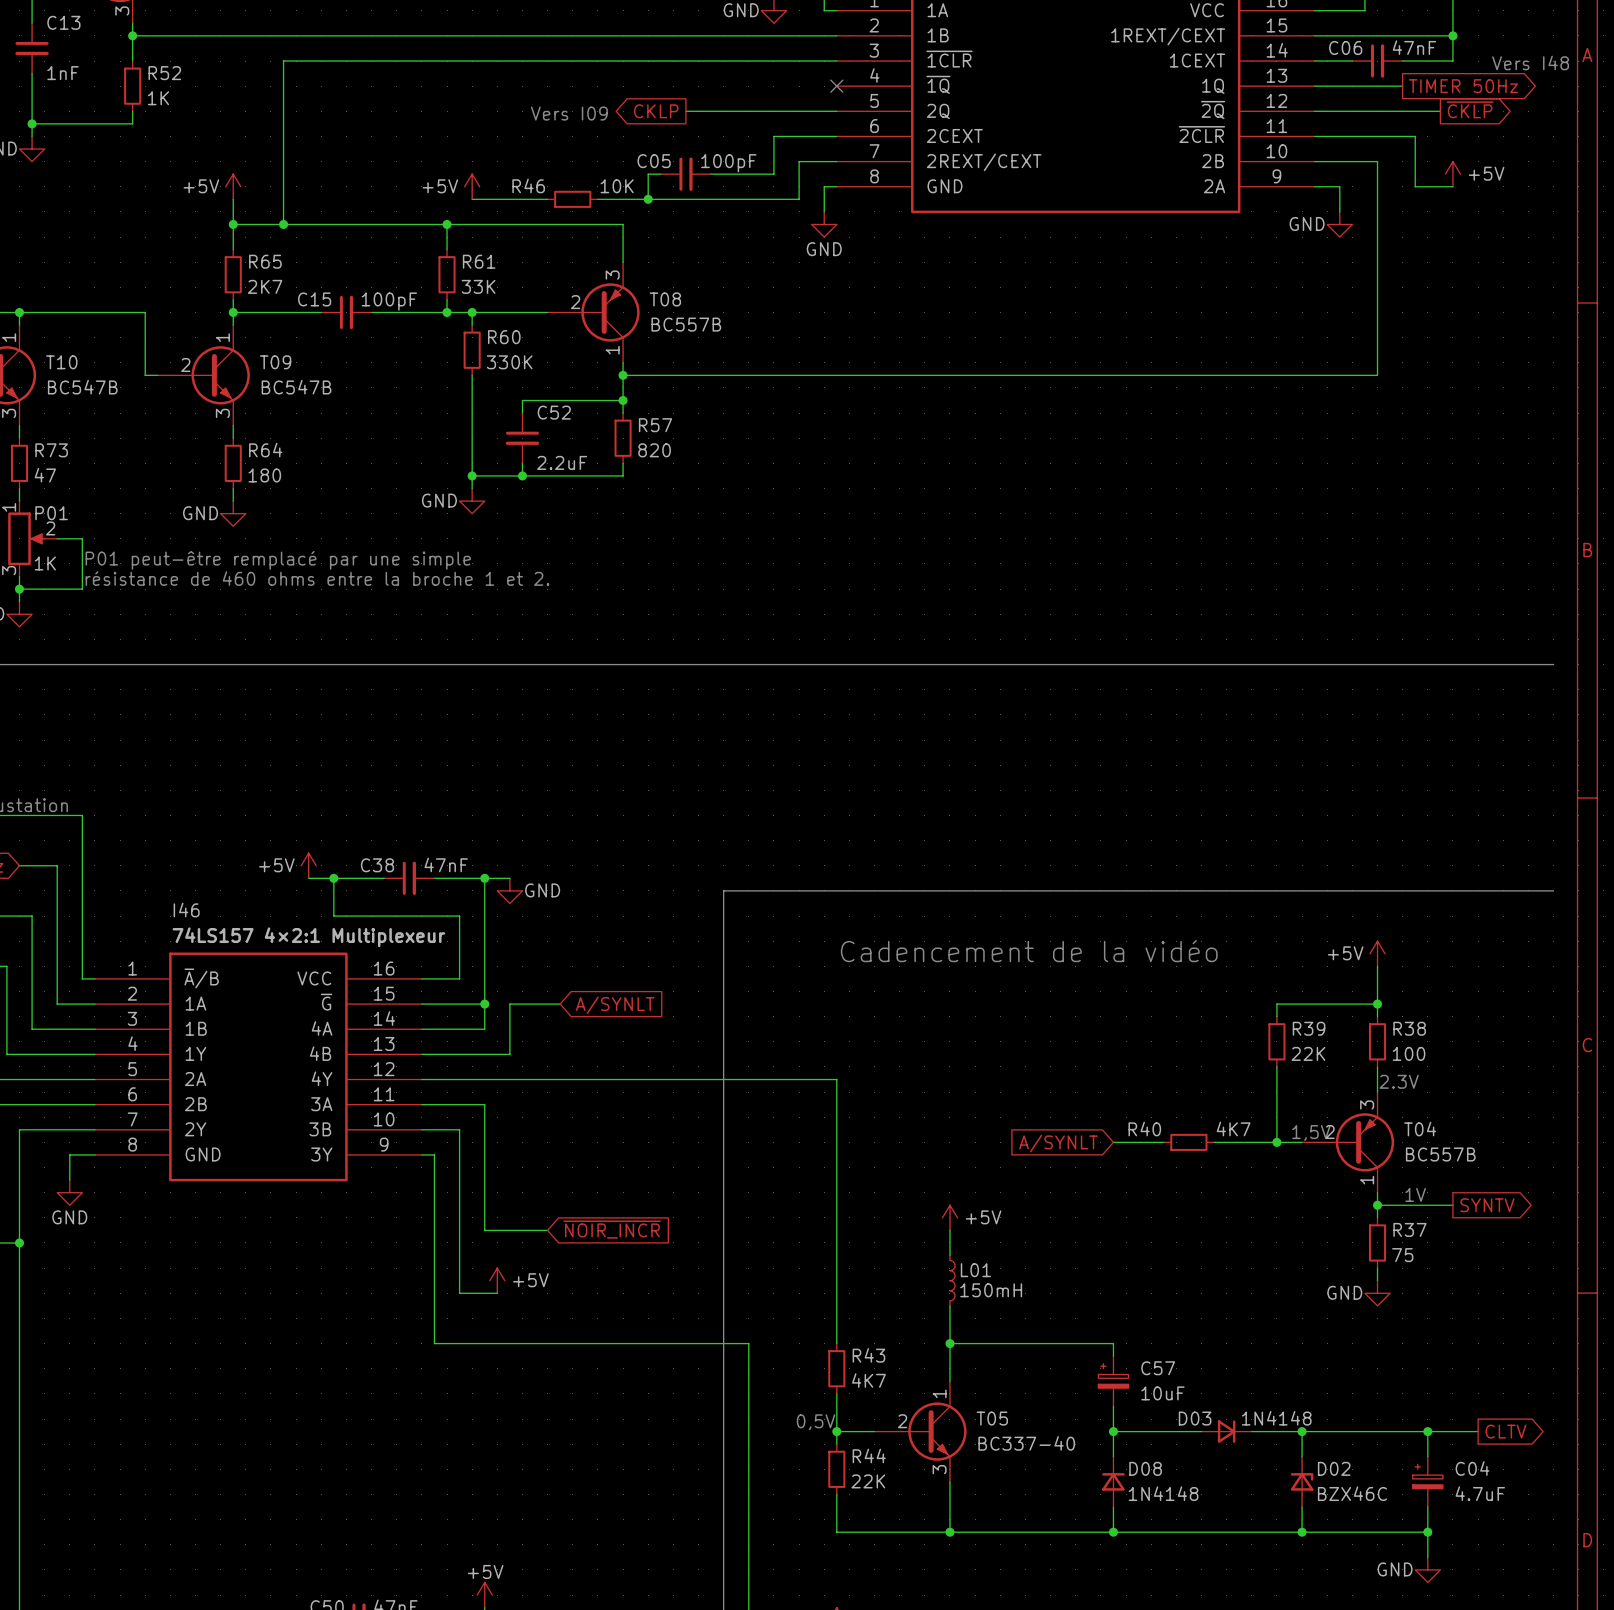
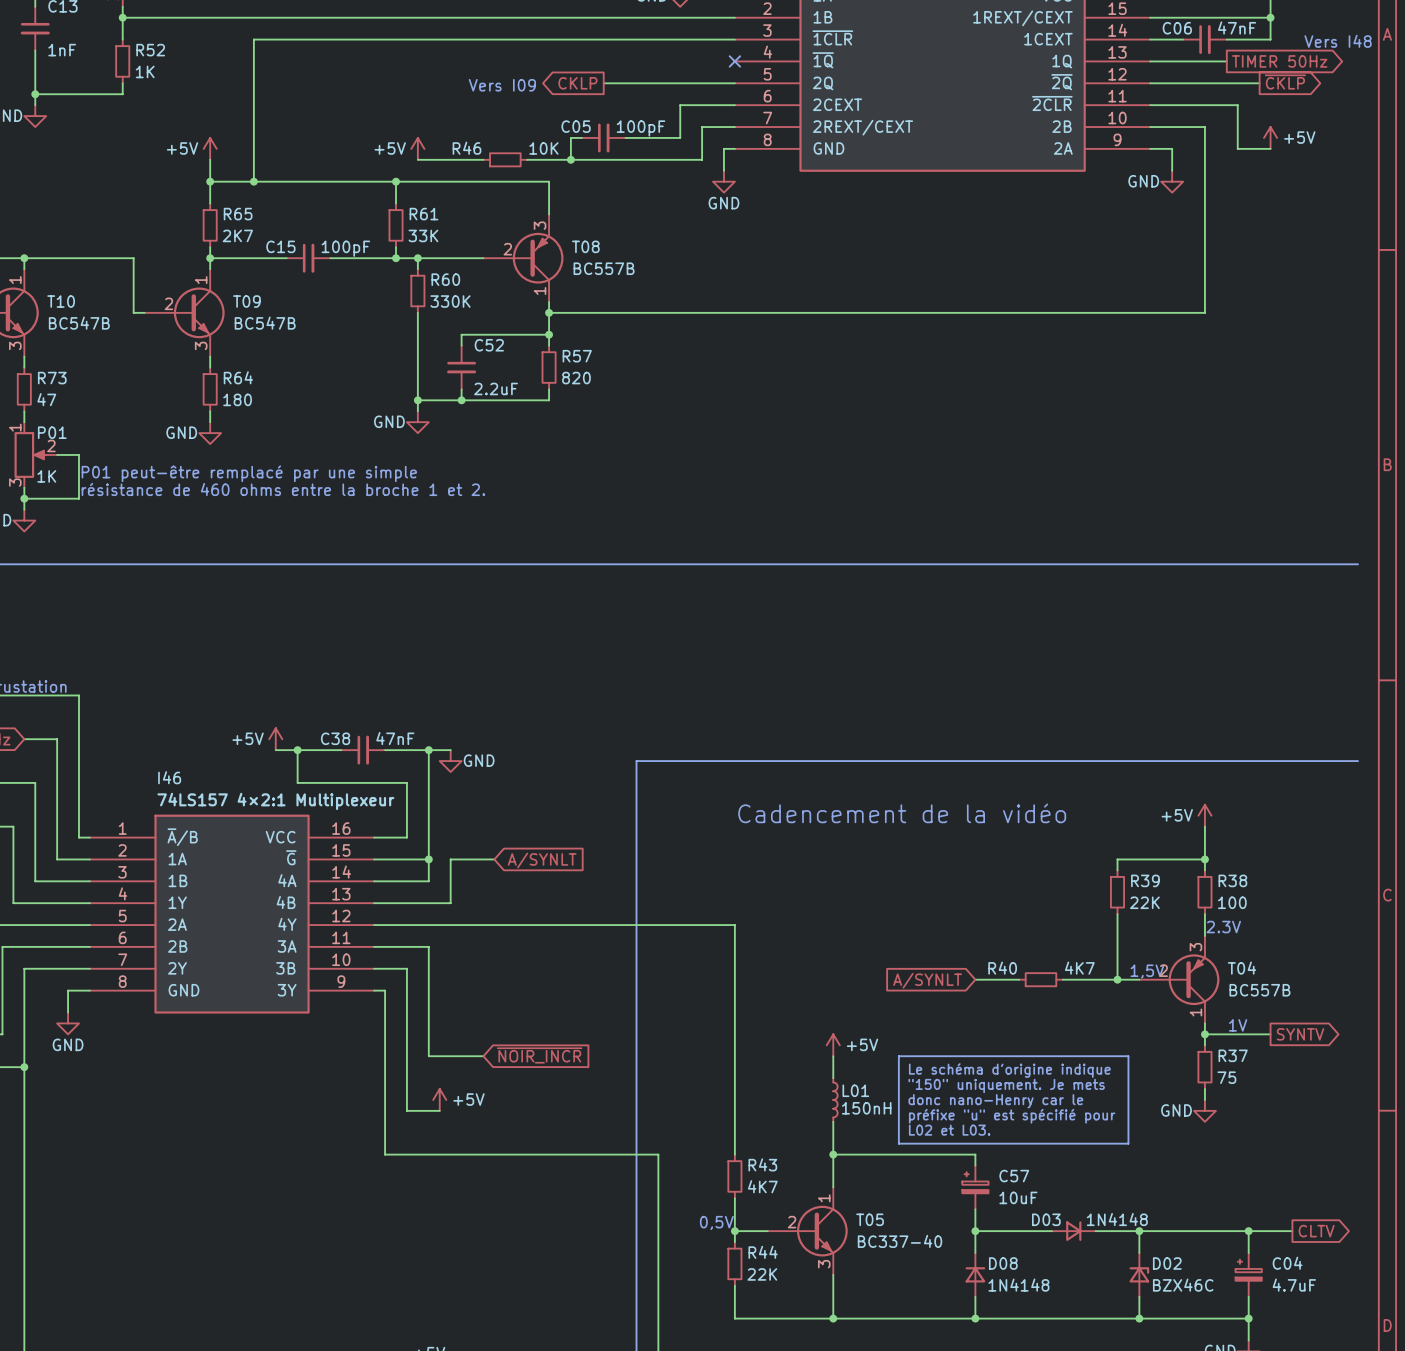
line: none -> (898, 1056) (1128, 1056) (1128, 1143) (898, 1143) (898, 1056)
text: none -> Le schéma d'origine indique (1009, 1070)
text: none -> "150" uniquement. Je mets (1006, 1085)
text: none -> donc nano-Henry car le (995, 1101)
L01 value: 150mH (991, 1290) -> 150nH (866, 1108)
text: none -> préfixe "u" est spécifié pour (1012, 1116)
text: none -> L02 et L03. (949, 1130)

